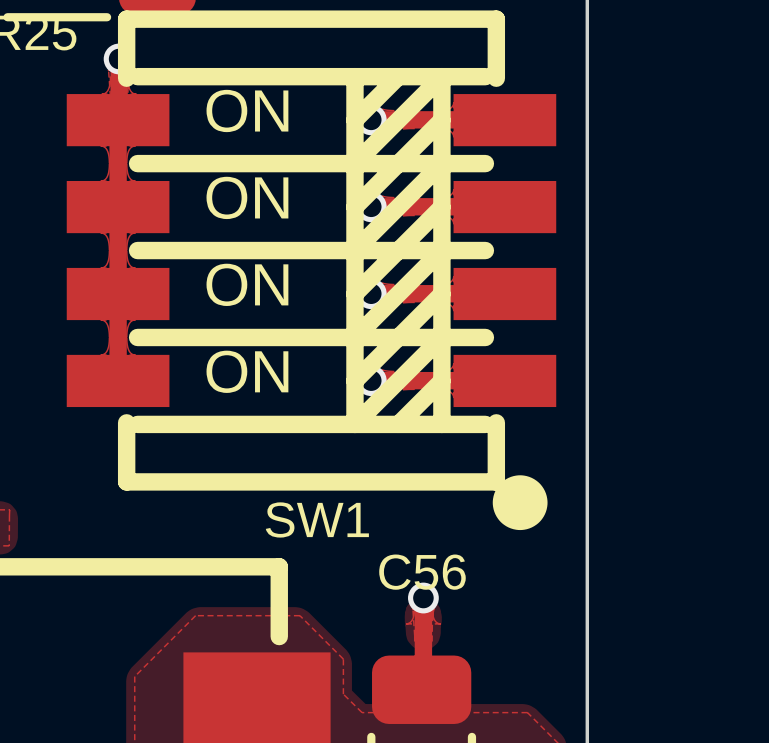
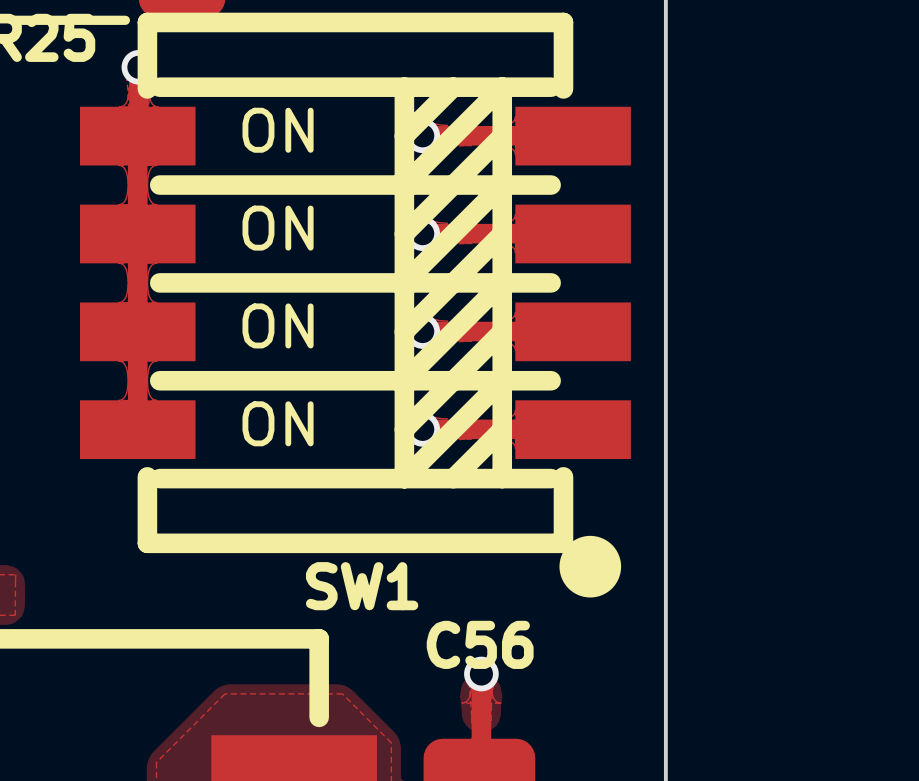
SW1 footprint: [66, 10, 557, 531] -> [79, 12, 631, 598]

